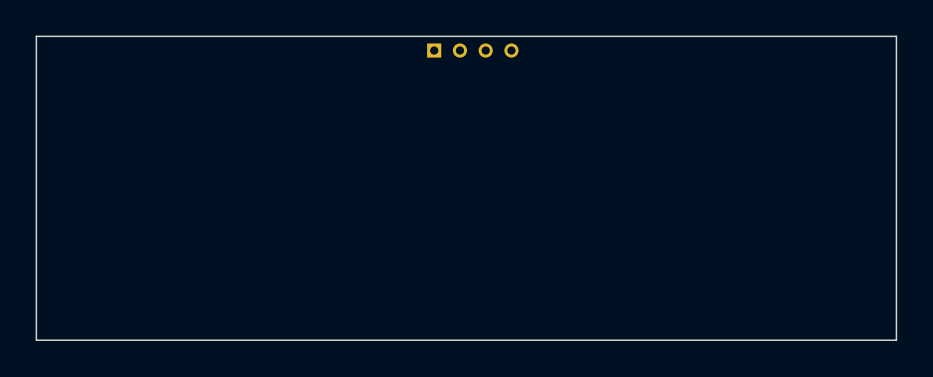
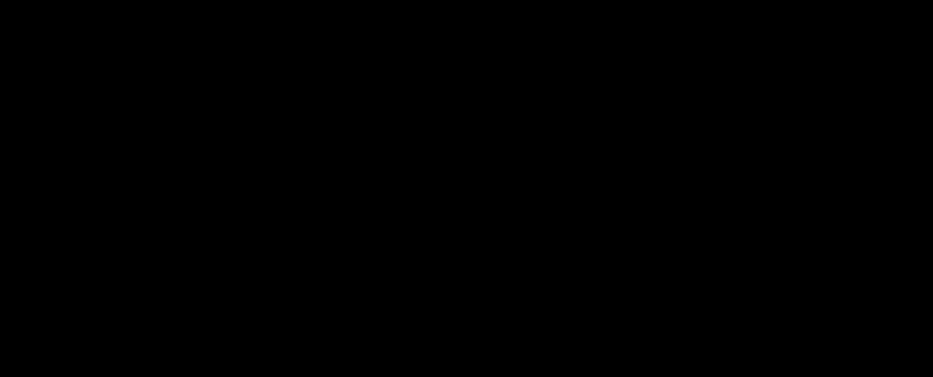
board edge: (896, 36) (896, 340) (36, 340) (36, 36) (896, 36) -> none
part: (472, 50) -> none

